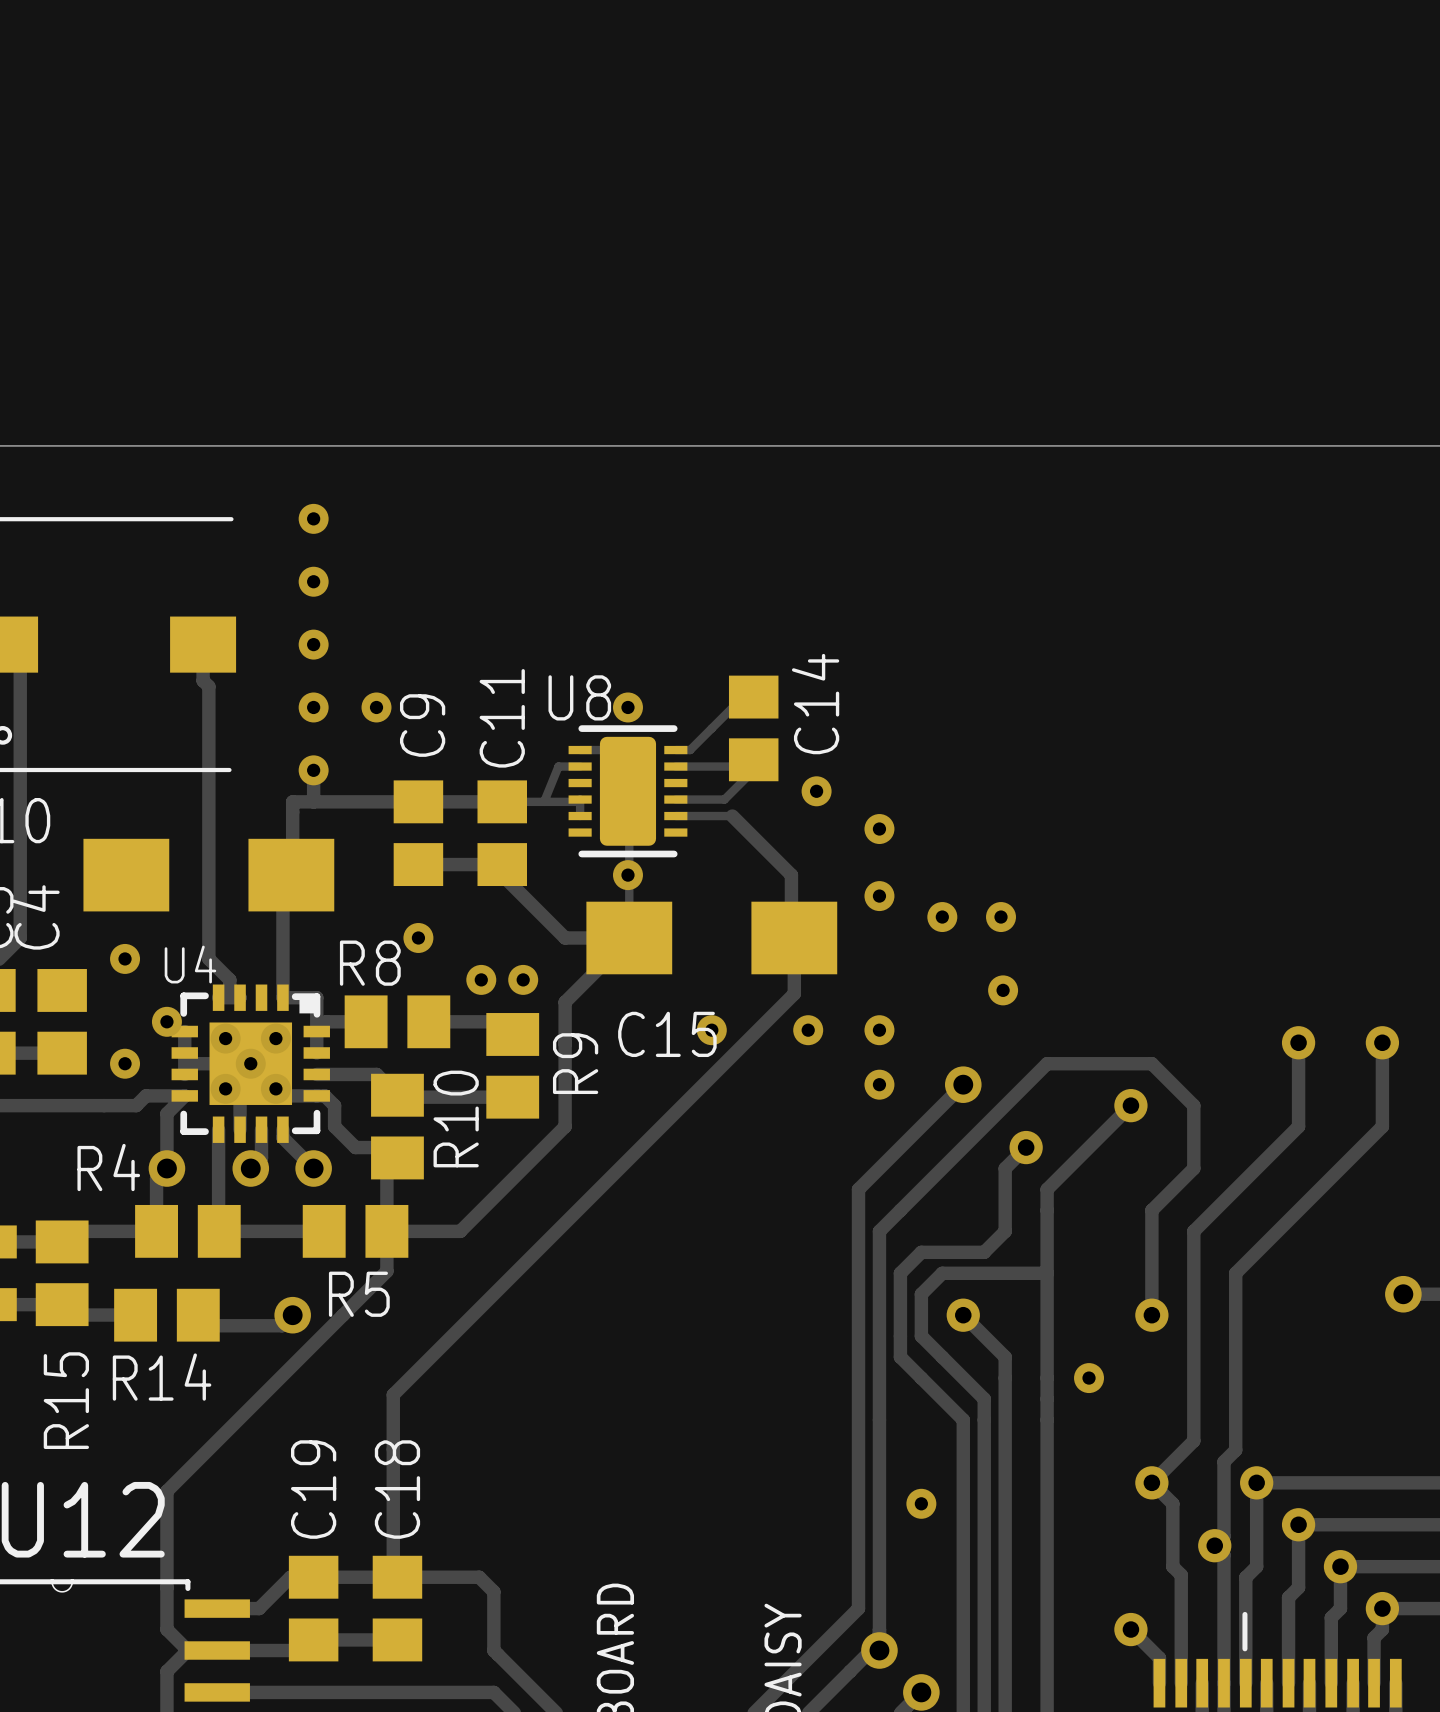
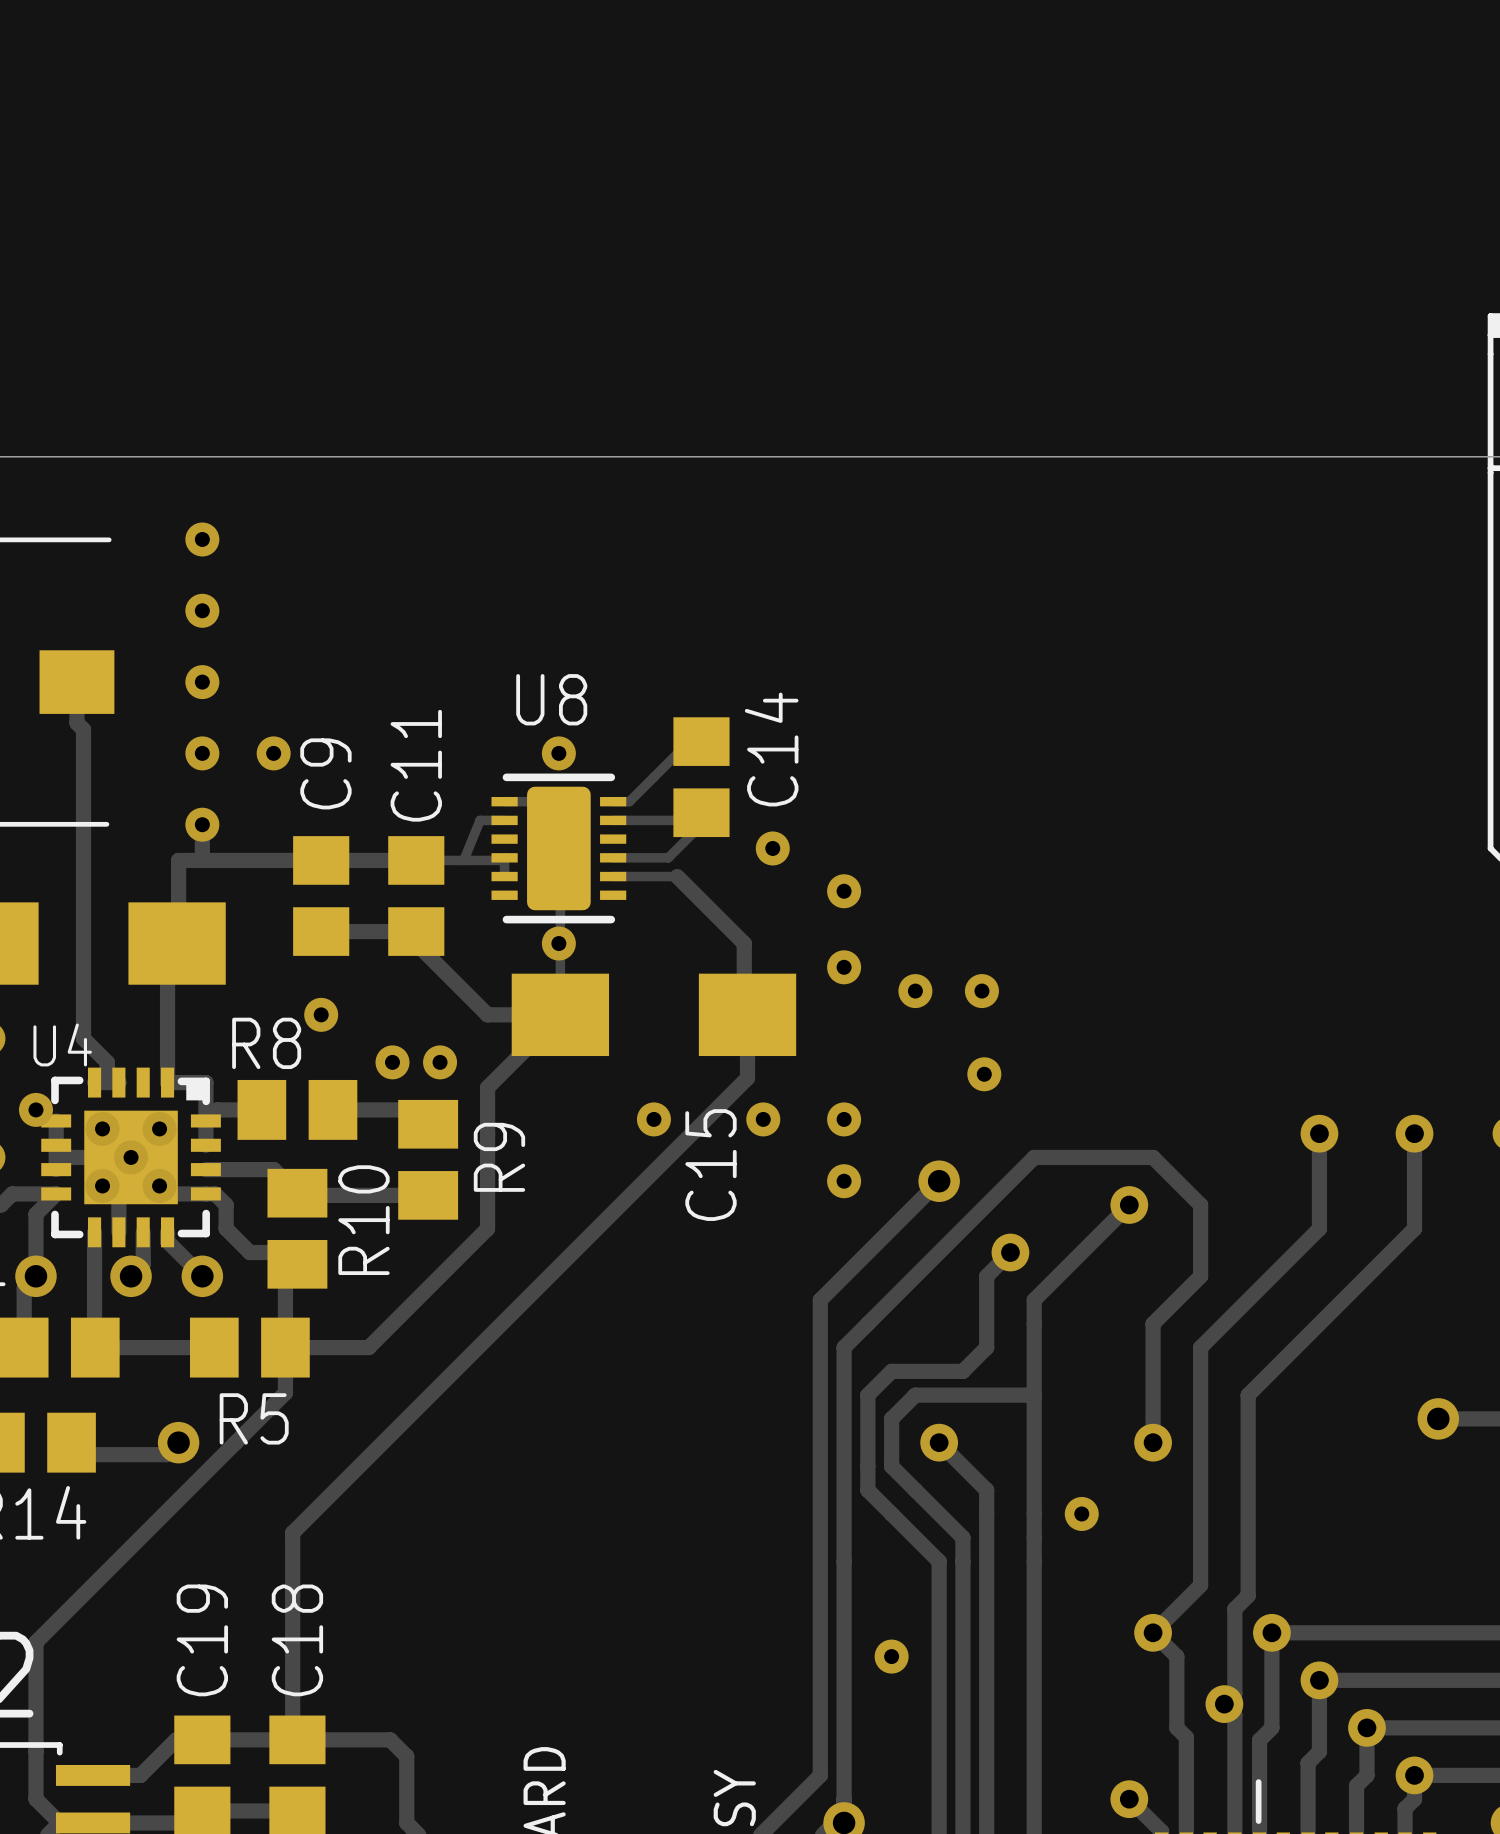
U8 name position: U8 (579, 697) -> U8 (551, 699)
C15 name rotation: 0° (667, 1034) -> 90° counterclockwise (710, 1165)

